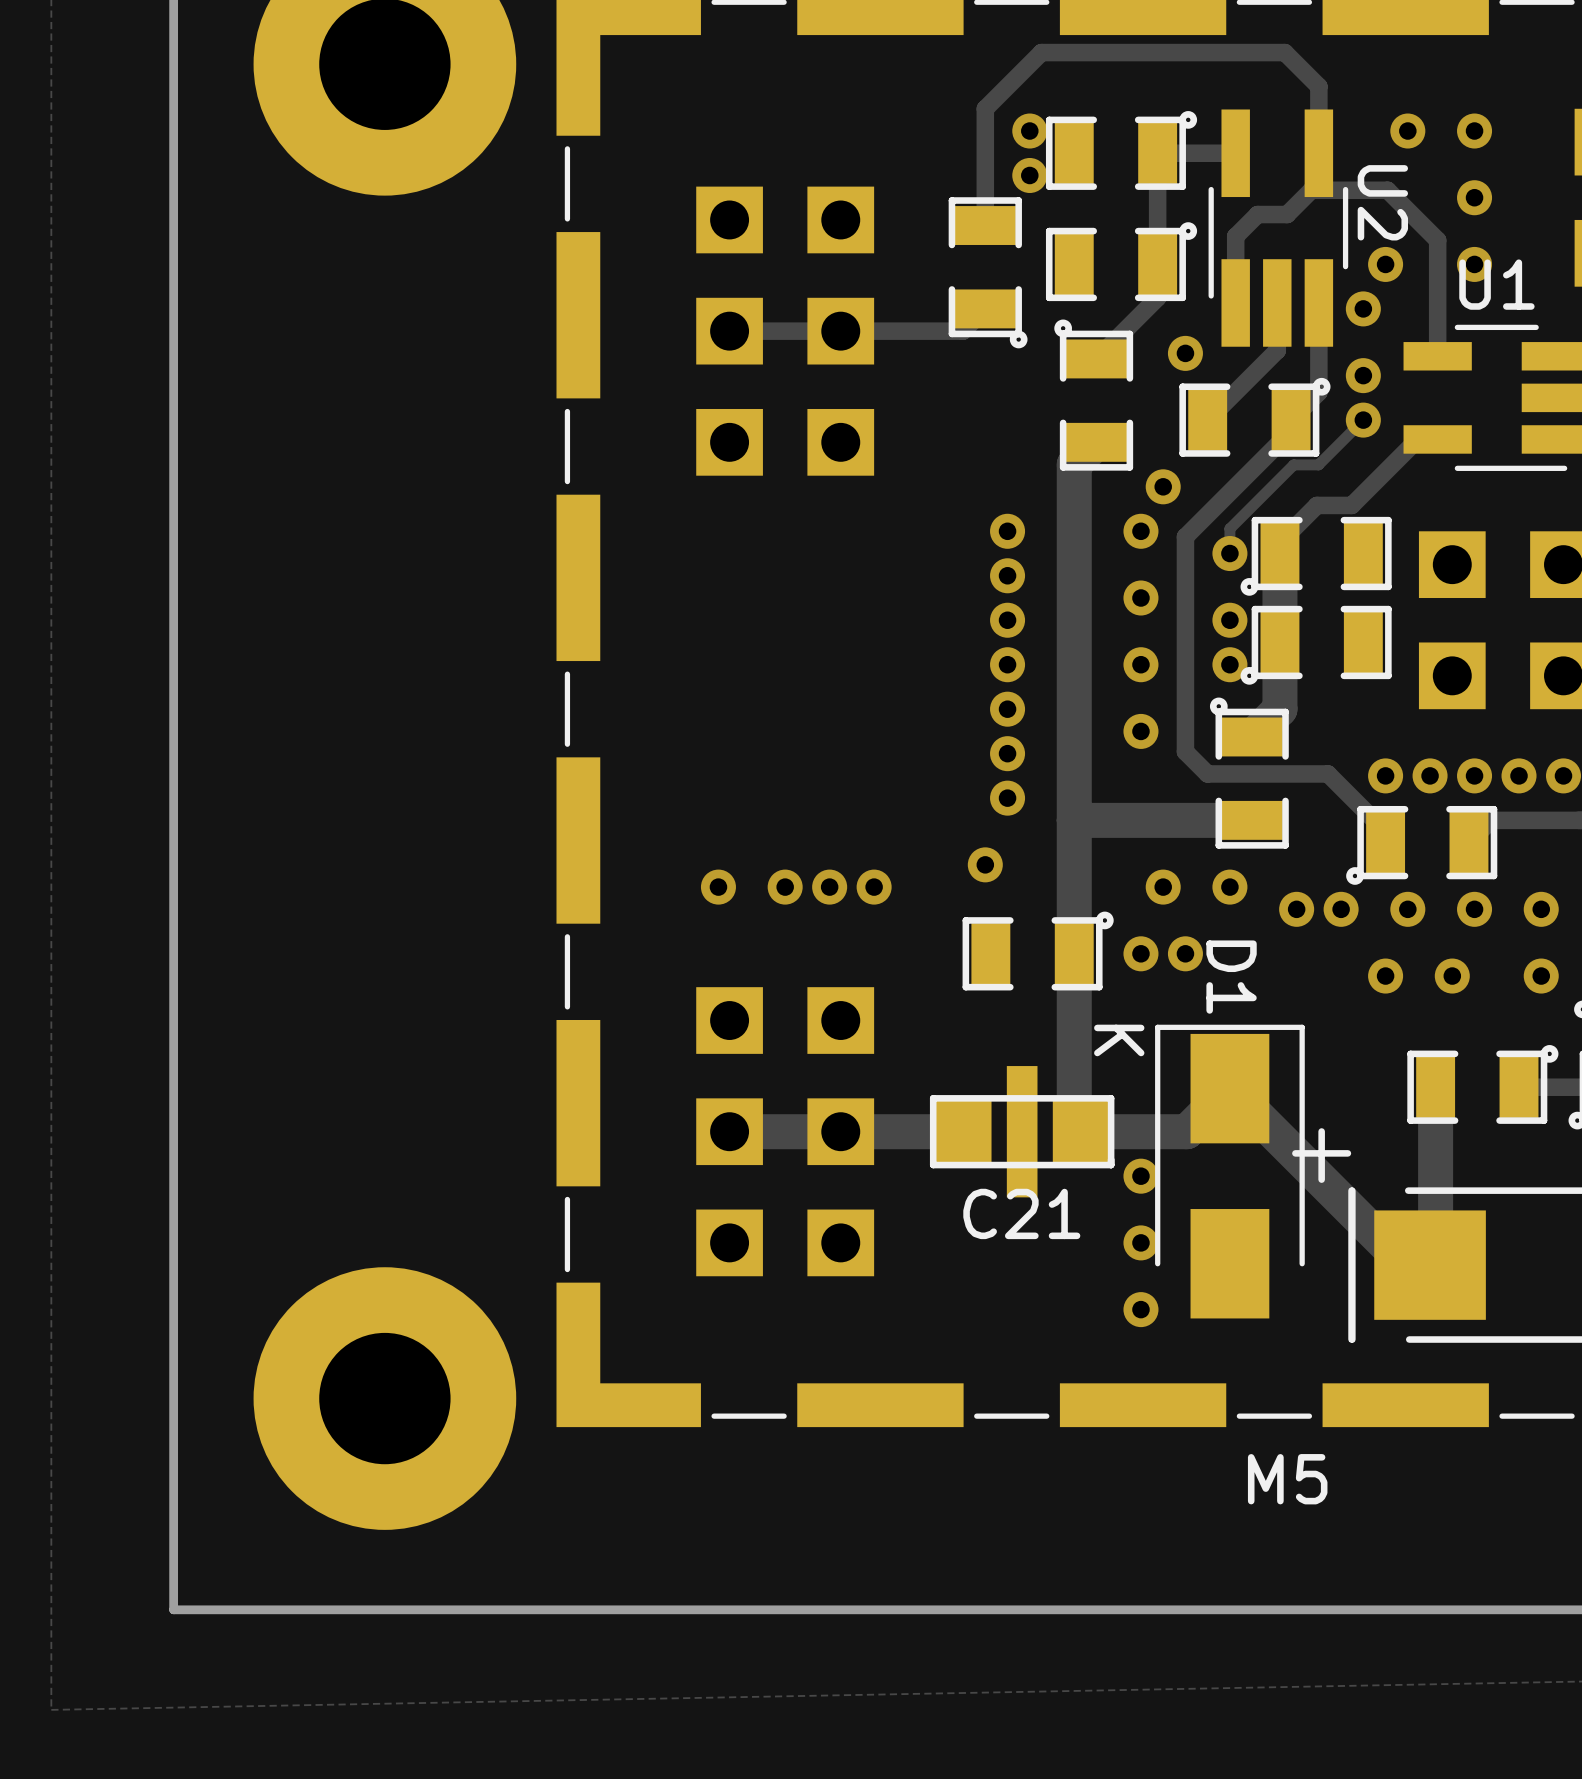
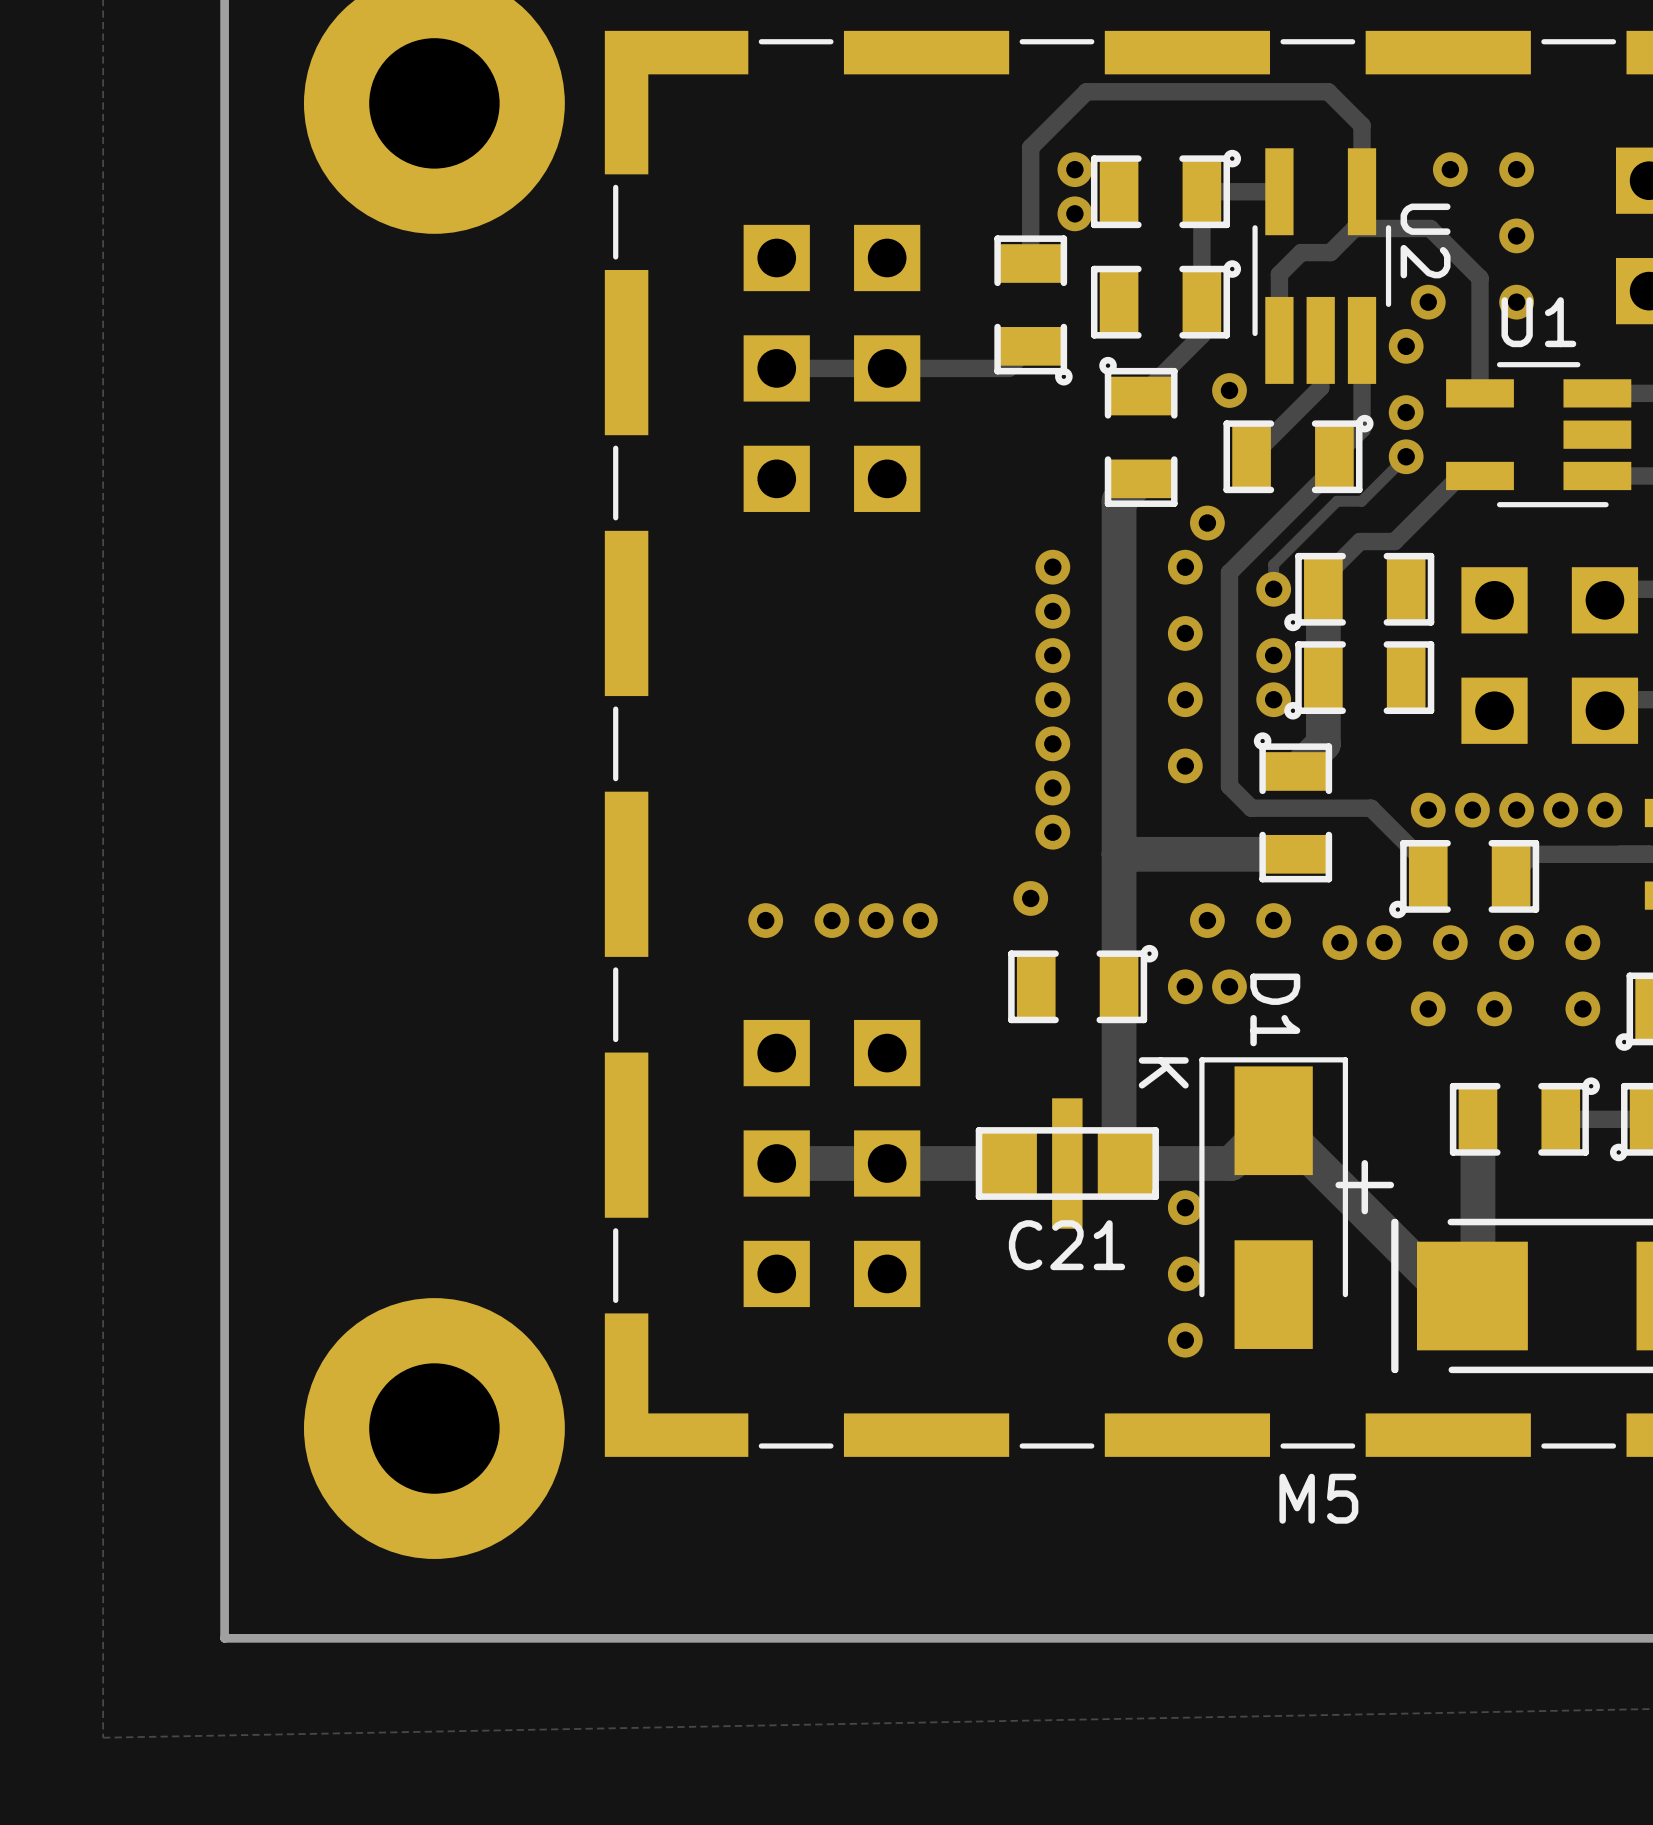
M5 name position: M5 (1287, 1479) -> M5 (1318, 1498)

